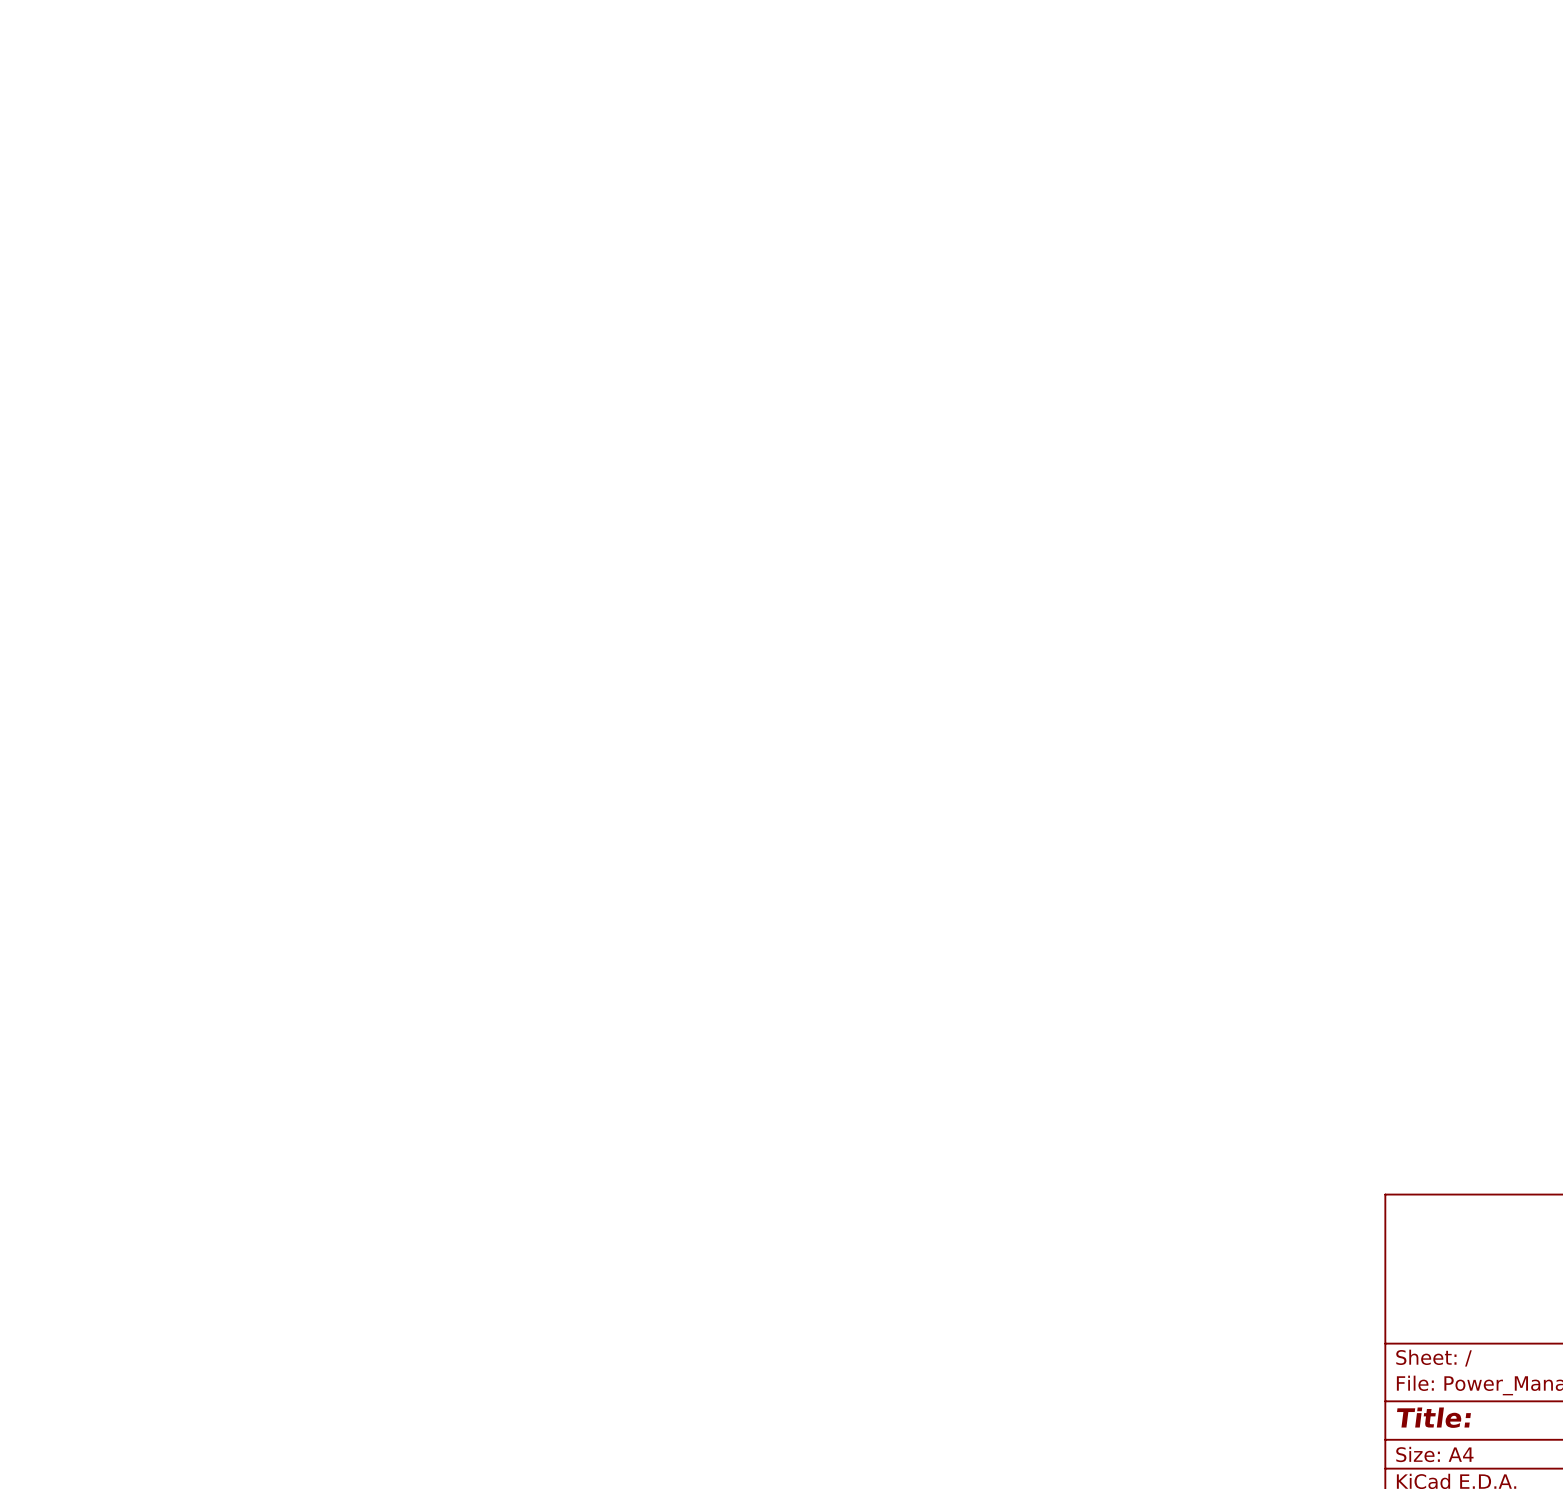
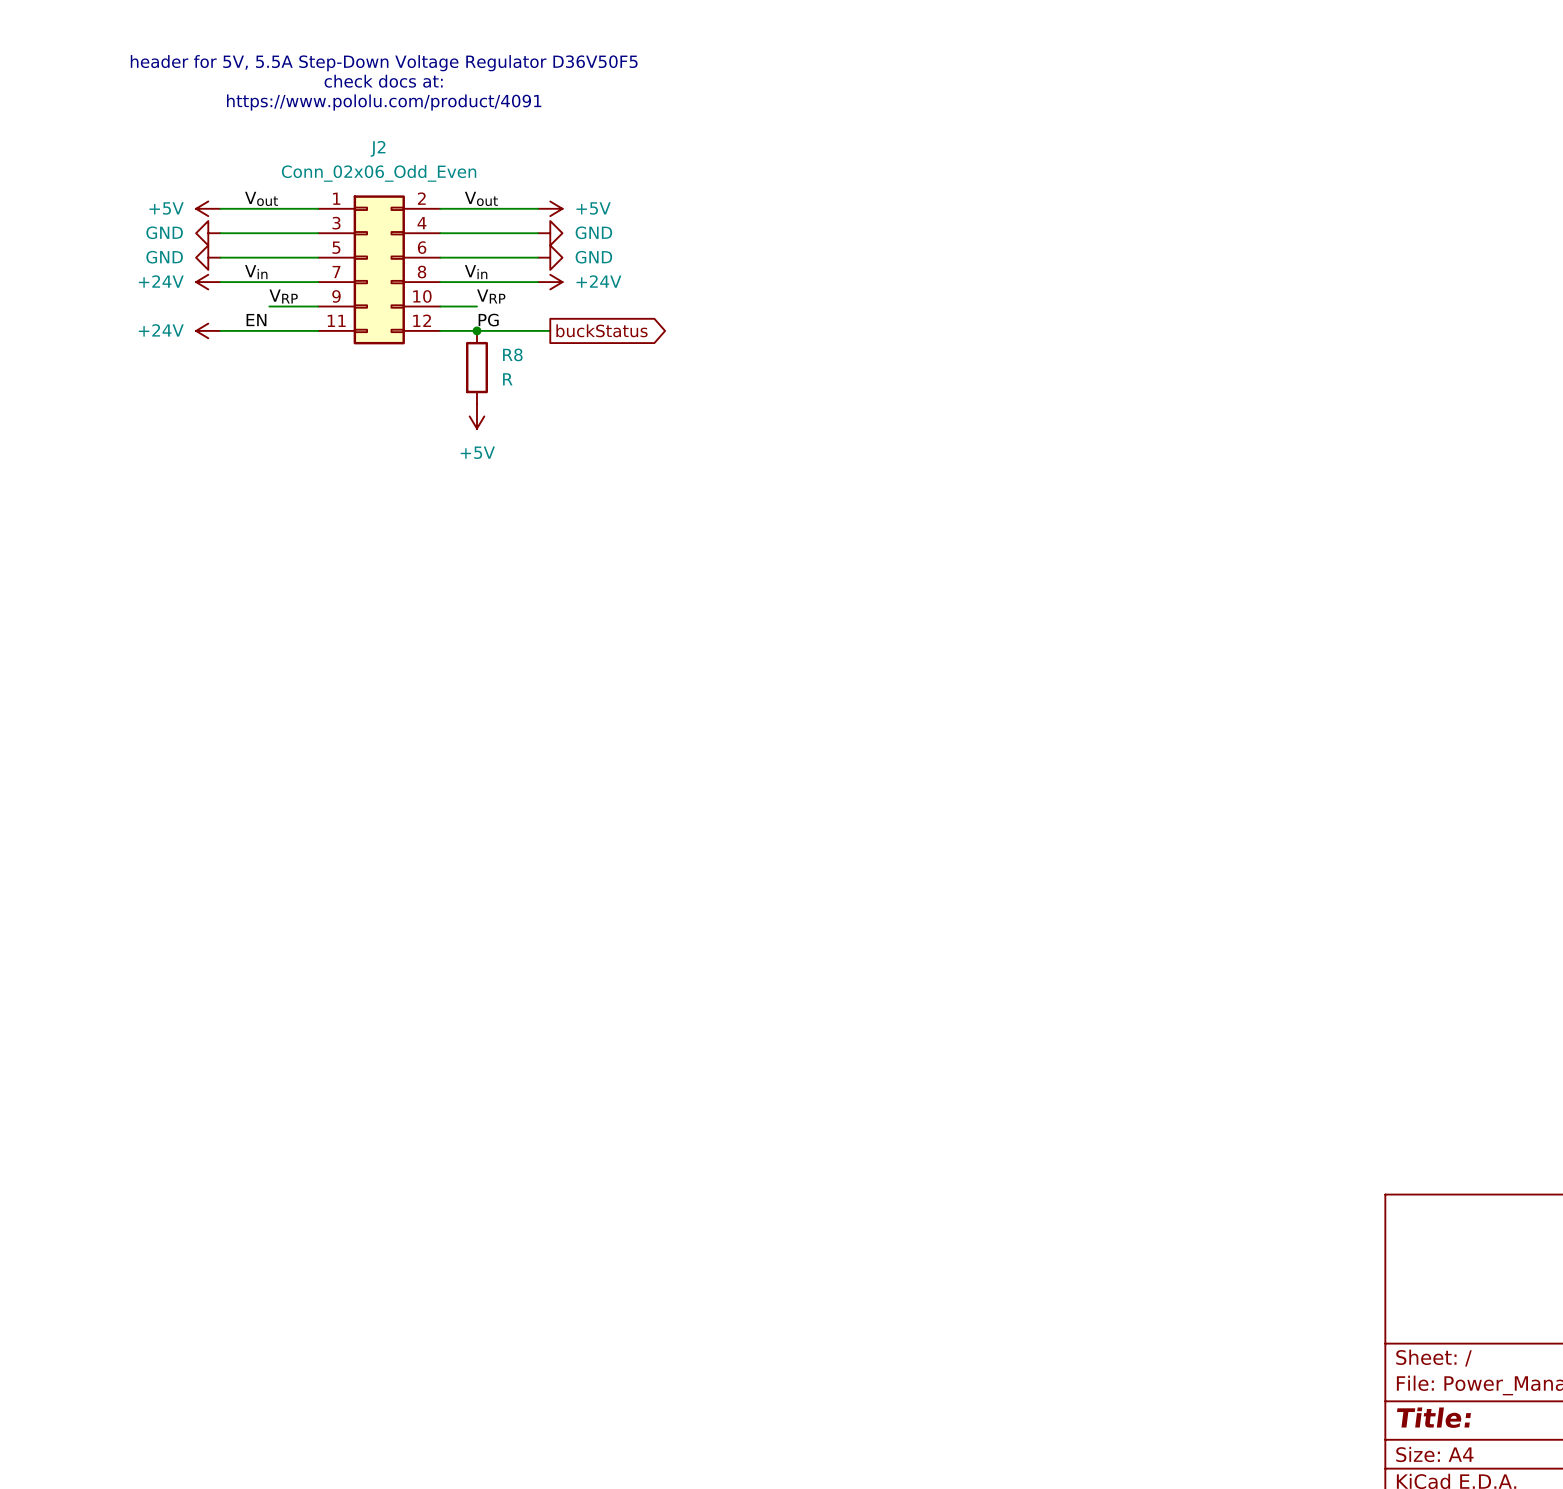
text: none -> header for 5V, 5.5A Step-Down Voltage Regulator D36V50F5 (384, 63)
text: none -> check docs at: (383, 81)
text: none -> https://www.pololu.com/product/4091 (384, 102)
label: none -> Vout (261, 198)
label: none -> Vout (481, 198)
power symbol: none -> +5V (208, 208)
wire: none -> (220, 208) (318, 208)
wire: none -> (440, 208) (538, 208)
power symbol: none -> +5V (550, 208)
power symbol: none -> GND (208, 233)
wire: none -> (220, 233) (318, 233)
wire: none -> (440, 233) (538, 233)
power symbol: none -> GND (550, 233)
power symbol: none -> GND (208, 257)
wire: none -> (220, 257) (318, 257)
wire: none -> (440, 257) (538, 257)
power symbol: none -> GND (550, 257)
J2: none -> Conn_02x06_Odd_Even (379, 269)
label: none -> Vin (256, 272)
label: none -> Vin (476, 272)
power symbol: none -> +24V (208, 282)
wire: none -> (220, 282) (318, 282)
wire: none -> (440, 282) (538, 282)
power symbol: none -> +24V (550, 282)
label: none -> VRP (283, 296)
label: none -> VRP (491, 296)
wire: none -> (269, 306) (318, 306)
wire: none -> (440, 306) (476, 306)
label: none -> EN (256, 320)
label: none -> PG (488, 320)
power symbol: none -> +24V (208, 330)
wire: none -> (220, 330) (318, 330)
wire: none -> (440, 330) (550, 330)
junction: none -> (476, 330)
global label: none -> buckStatus (601, 330)
R8: none -> R (476, 367)
power symbol: none -> +5V (476, 416)

